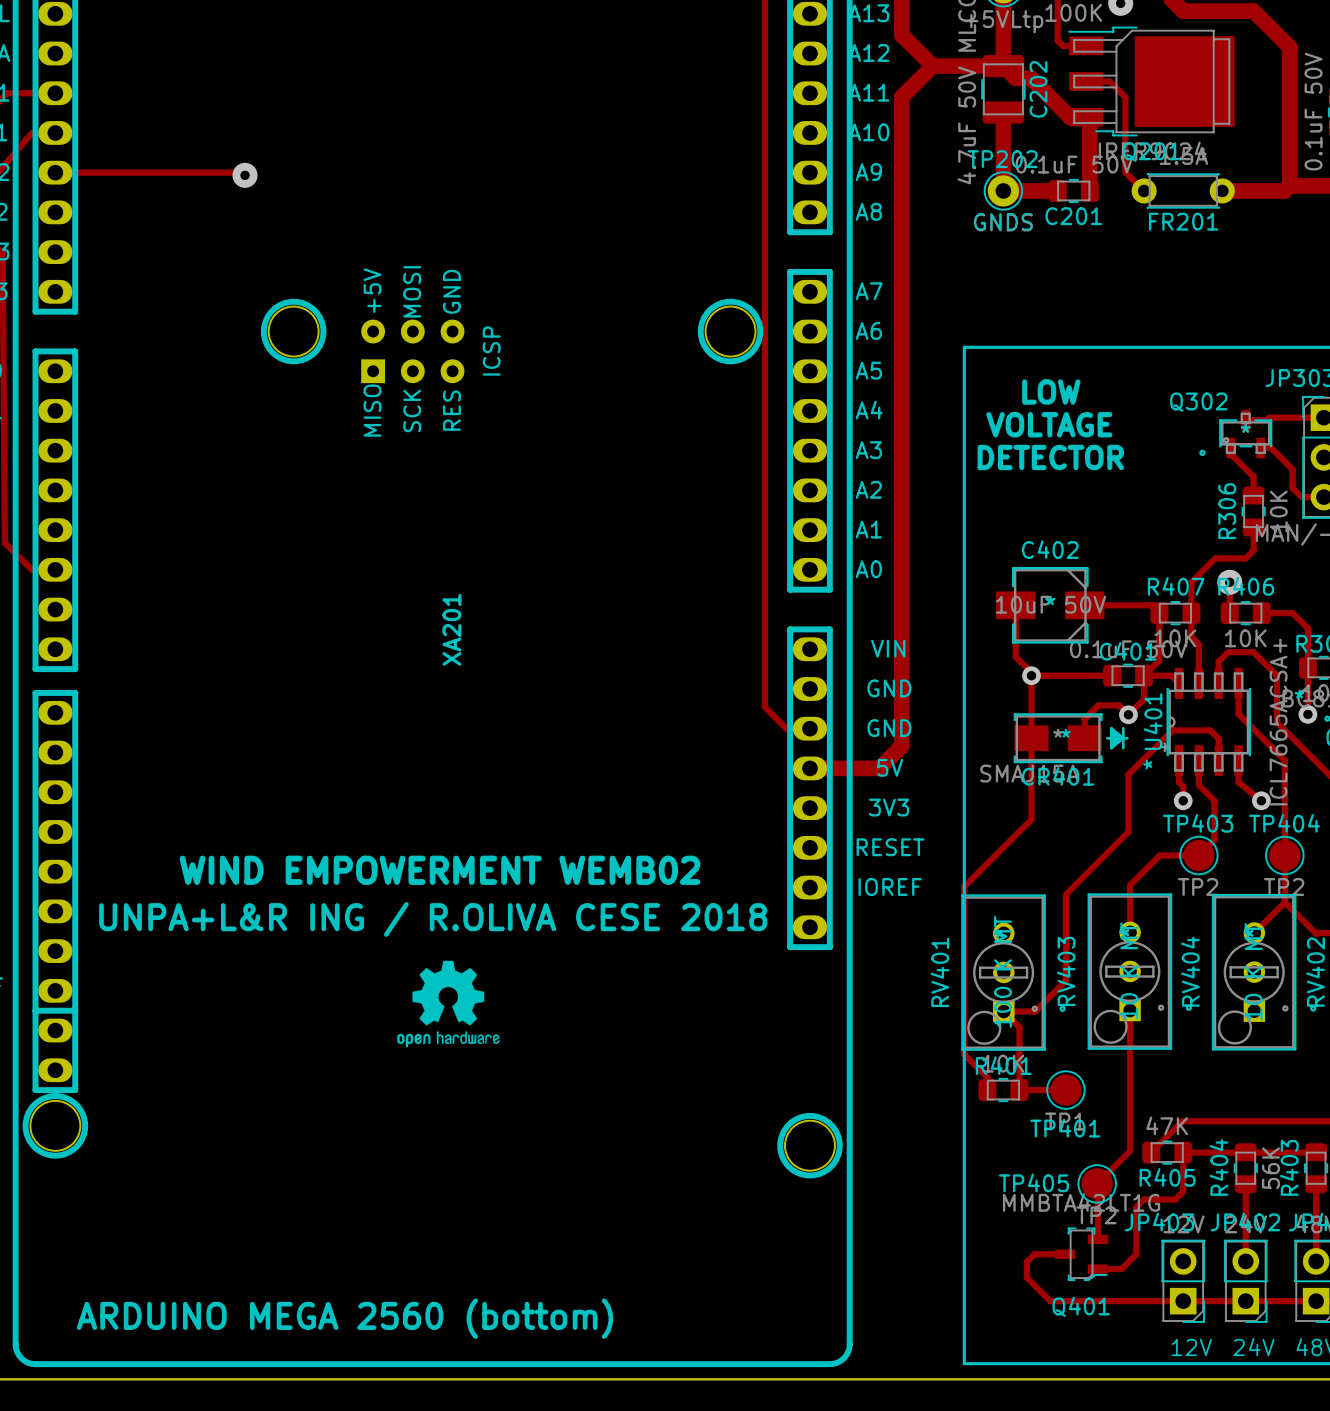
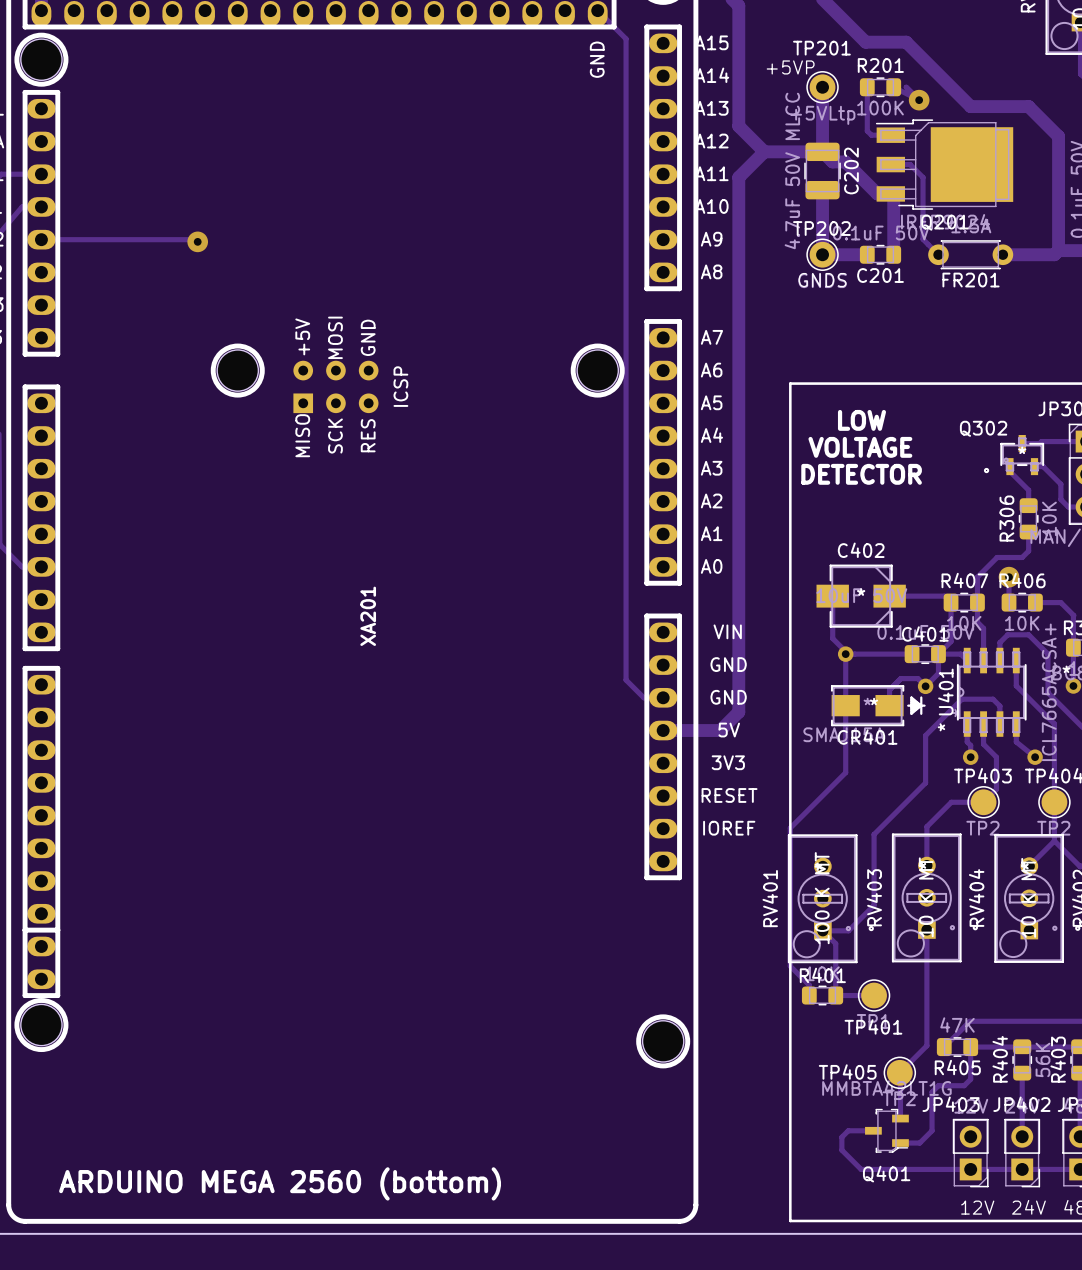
text: WIND EMPOWERMENT WEMB02 (439, 870) -> none
text: UNPA+L&R ING / R.OLIVA CESE 2018 (433, 919) -> none
drawing: [397, 960, 500, 1048] -> none

